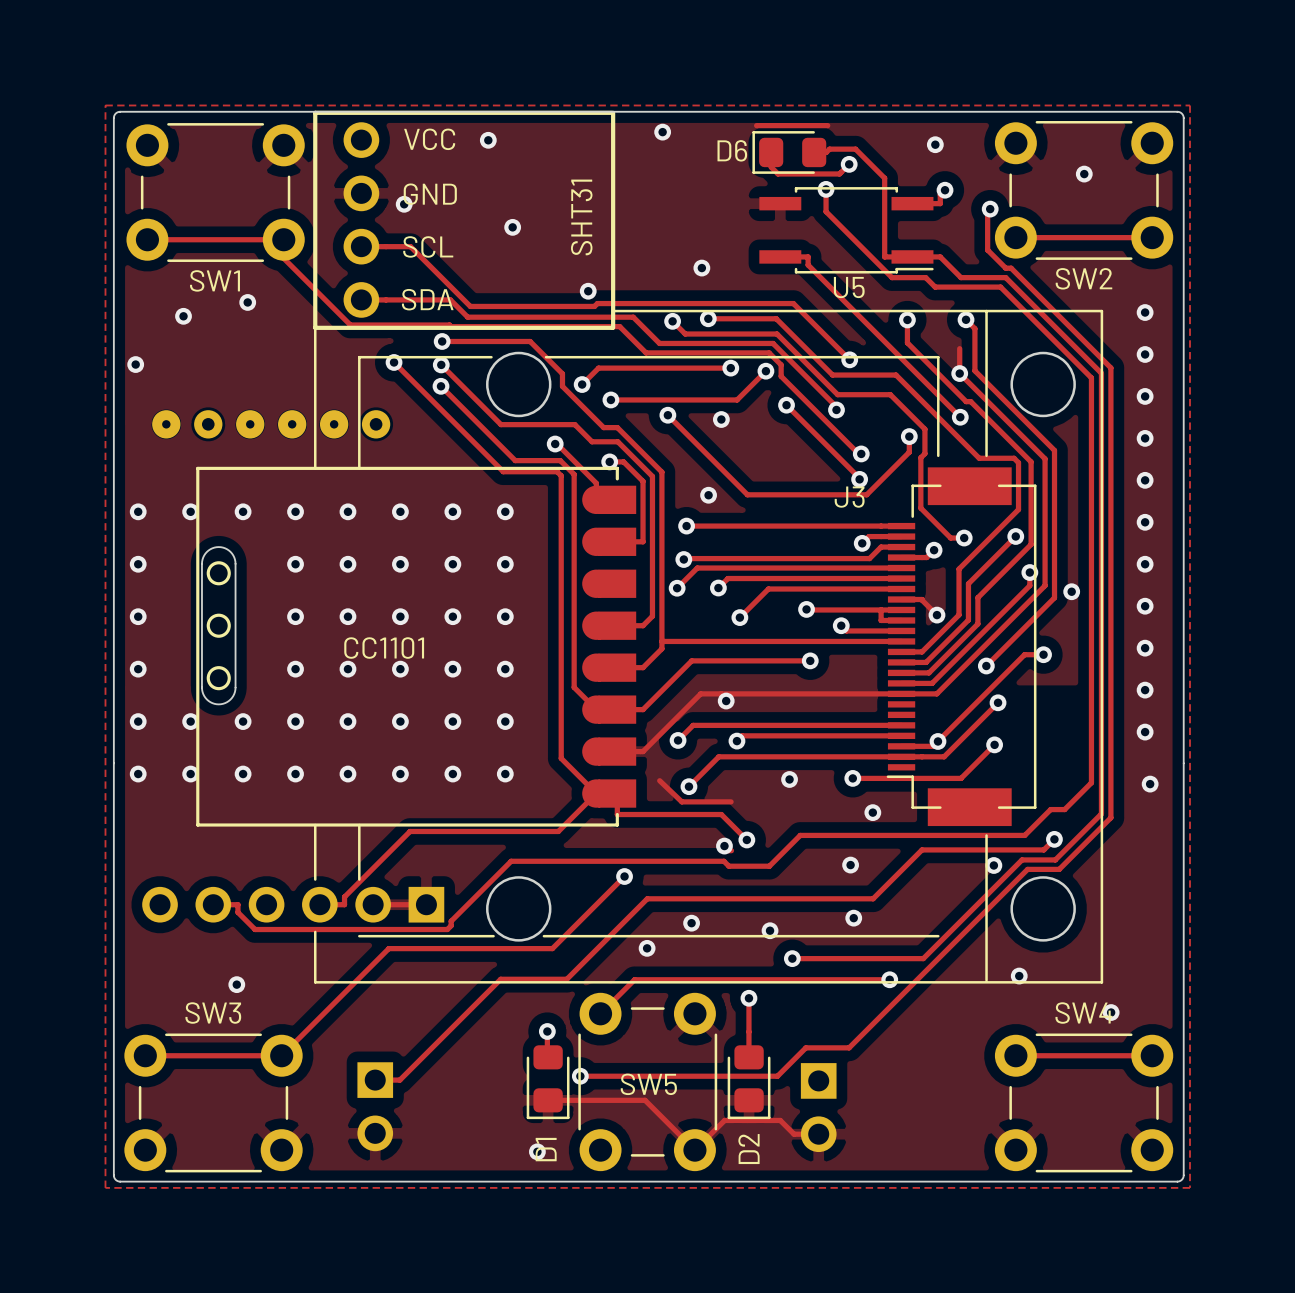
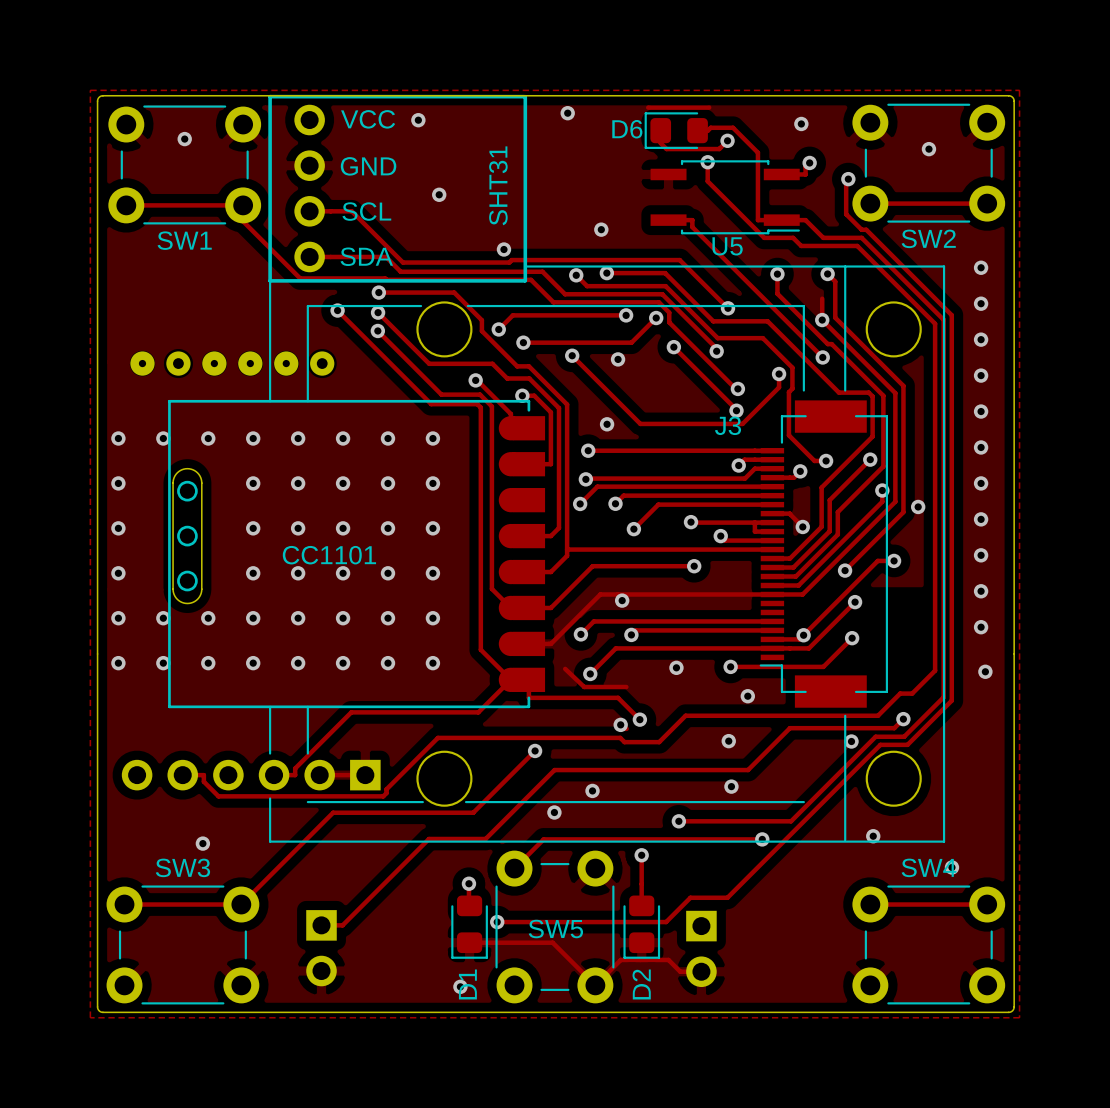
via: none -> (184, 139)
via: (404, 204) -> none
via: (247, 302) -> none
via: (183, 316) -> none
via: (135, 364) -> none
via: (770, 930) -> none

